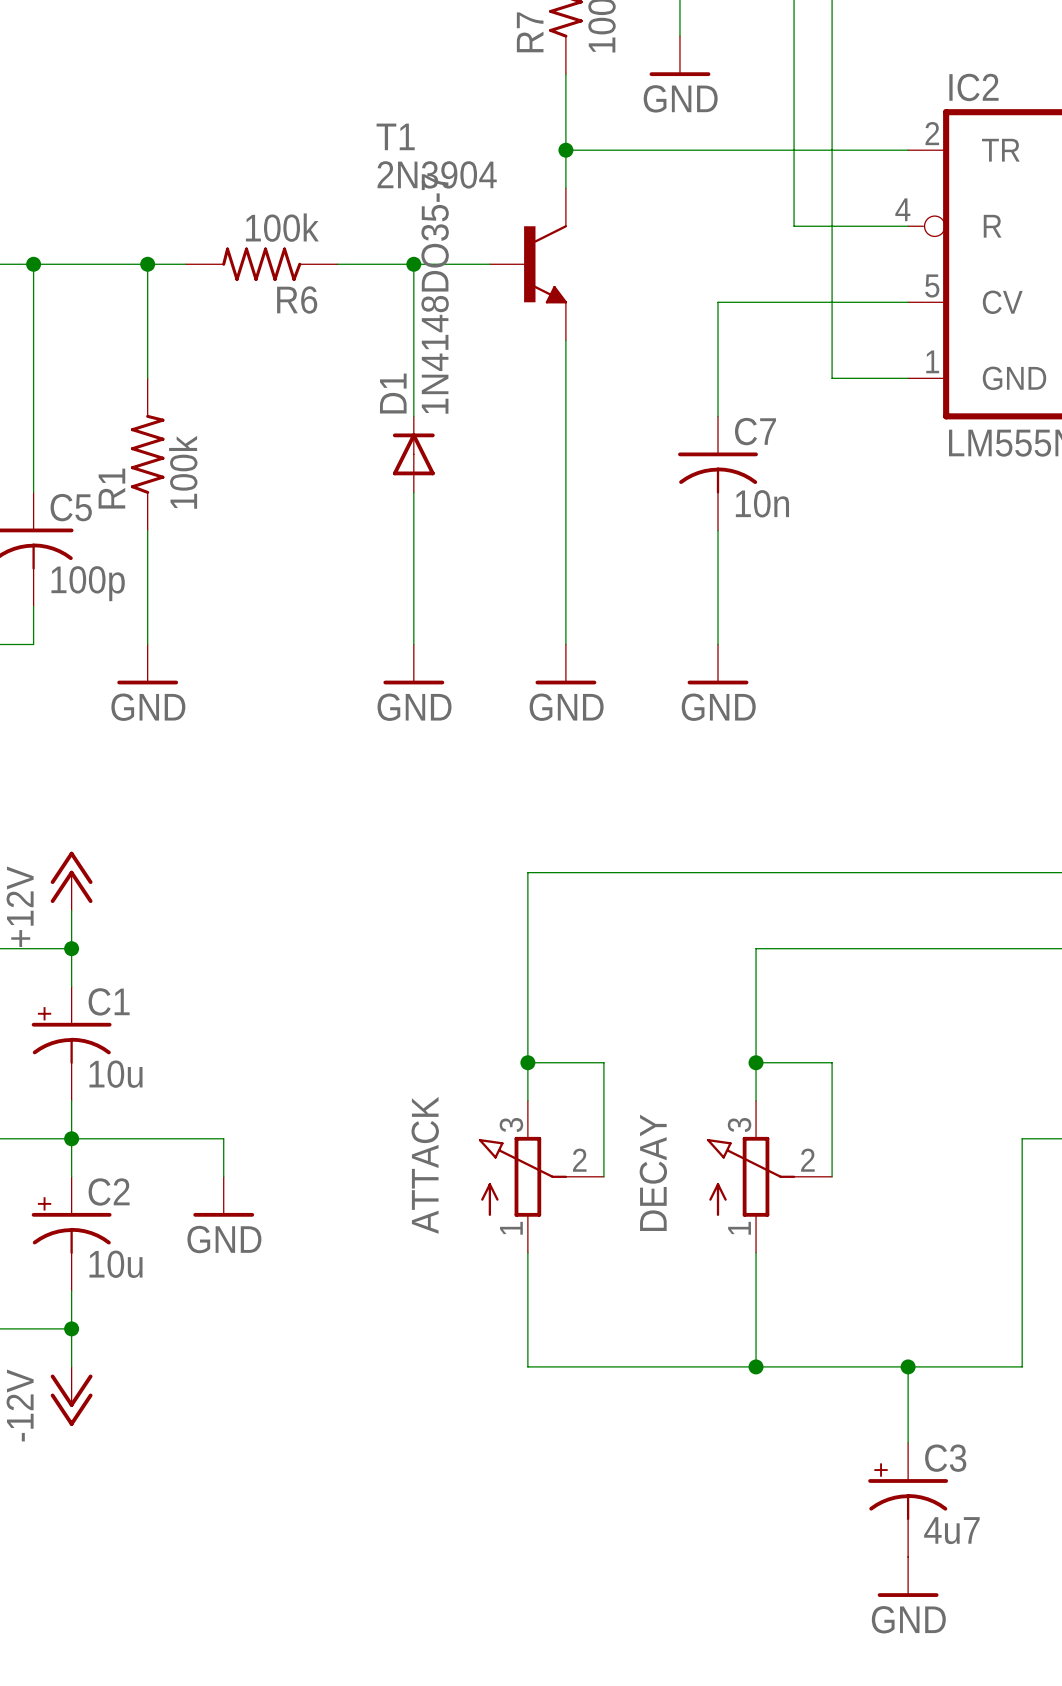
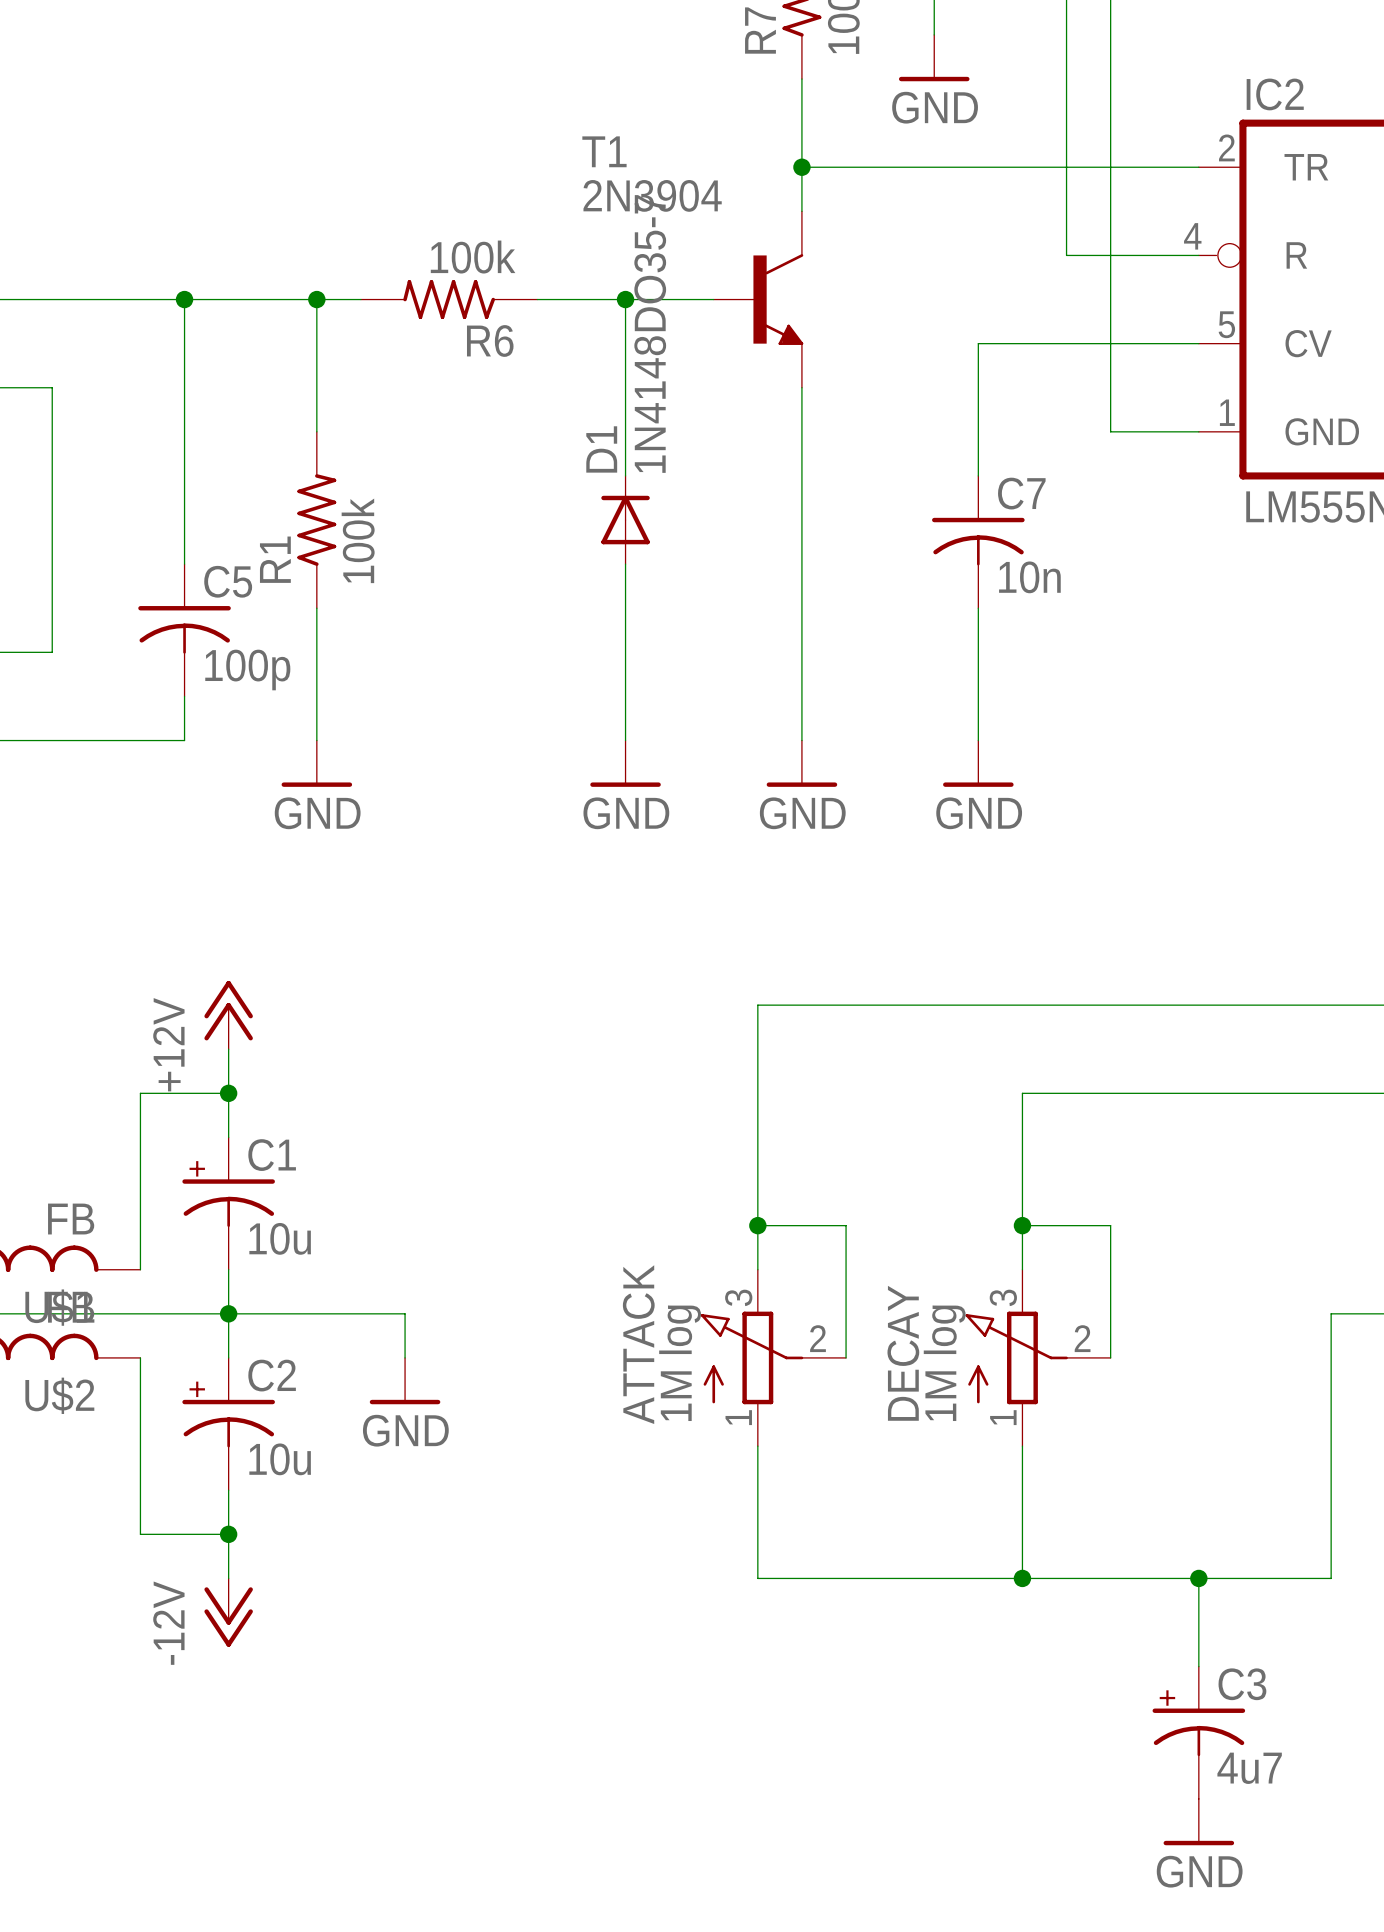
ATTACK value: none -> 1M log (680, 1363)
DECAY value: none -> 1M log (944, 1363)

